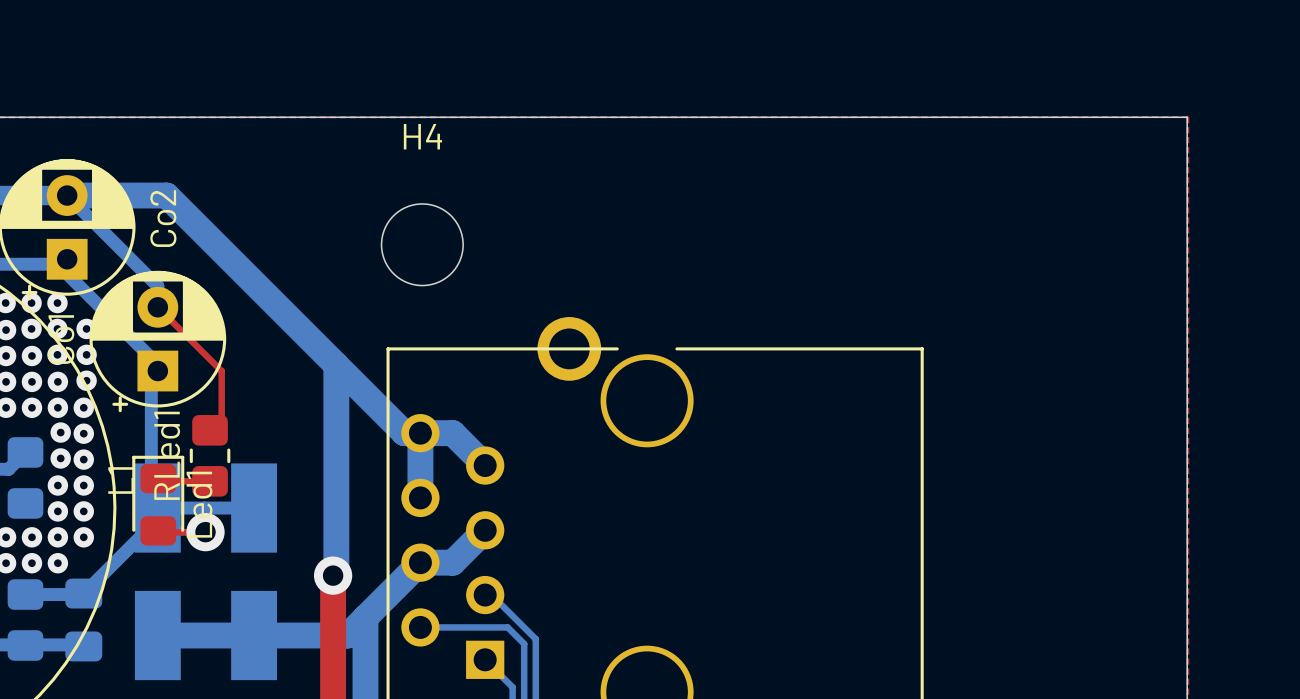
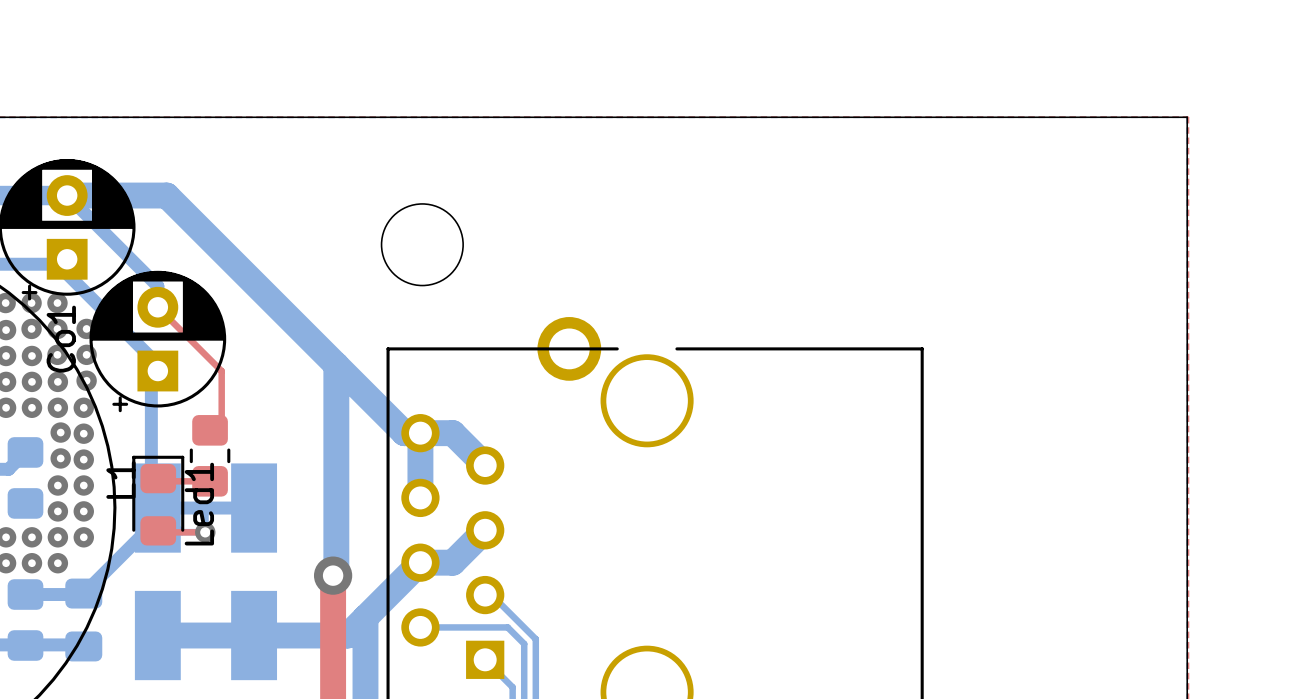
H4 name: H4 (422, 136) -> none
Co2 name: Co2 (163, 218) -> none
RLed1 name: RLed1 (167, 455) -> none
via: (205, 532) -> none

